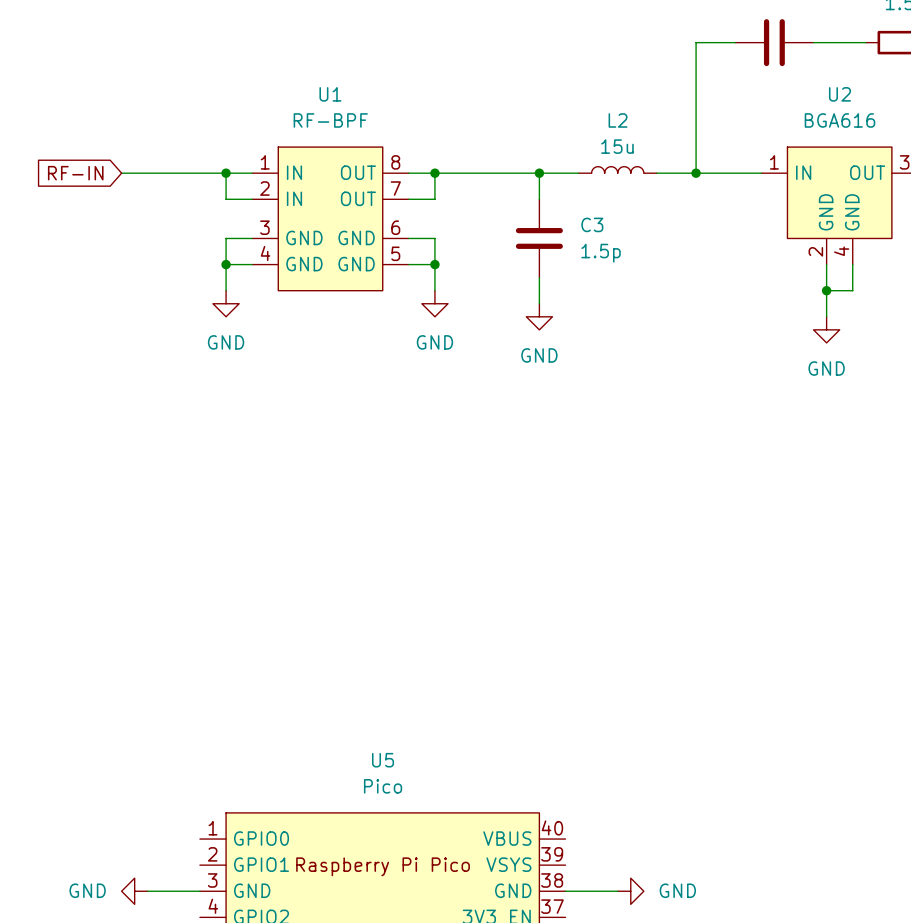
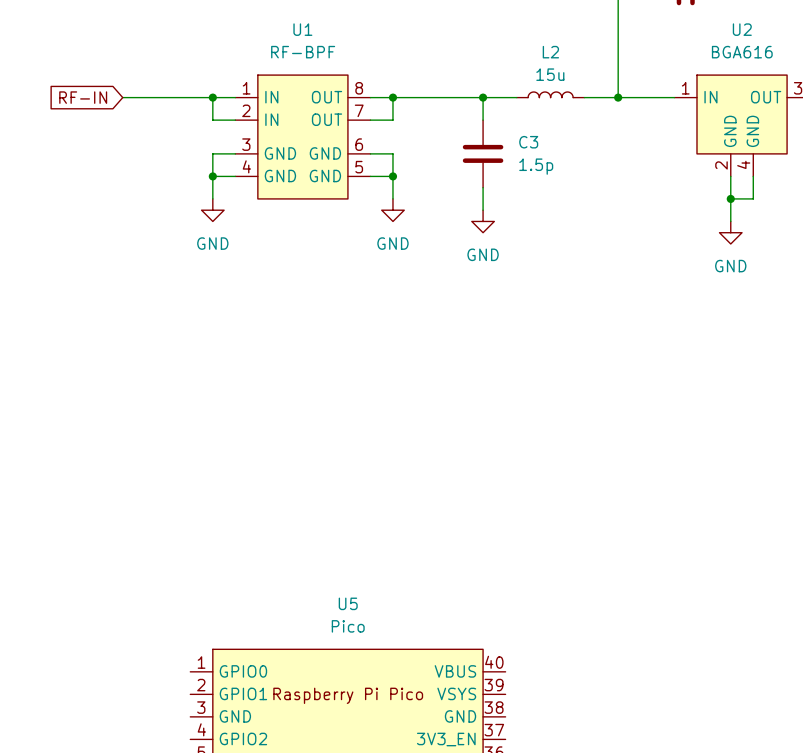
power symbol: GND (134, 891) -> none
wire: (147, 891) (199, 891) -> none
wire: (565, 891) (617, 891) -> none
power symbol: GND (630, 891) -> none

